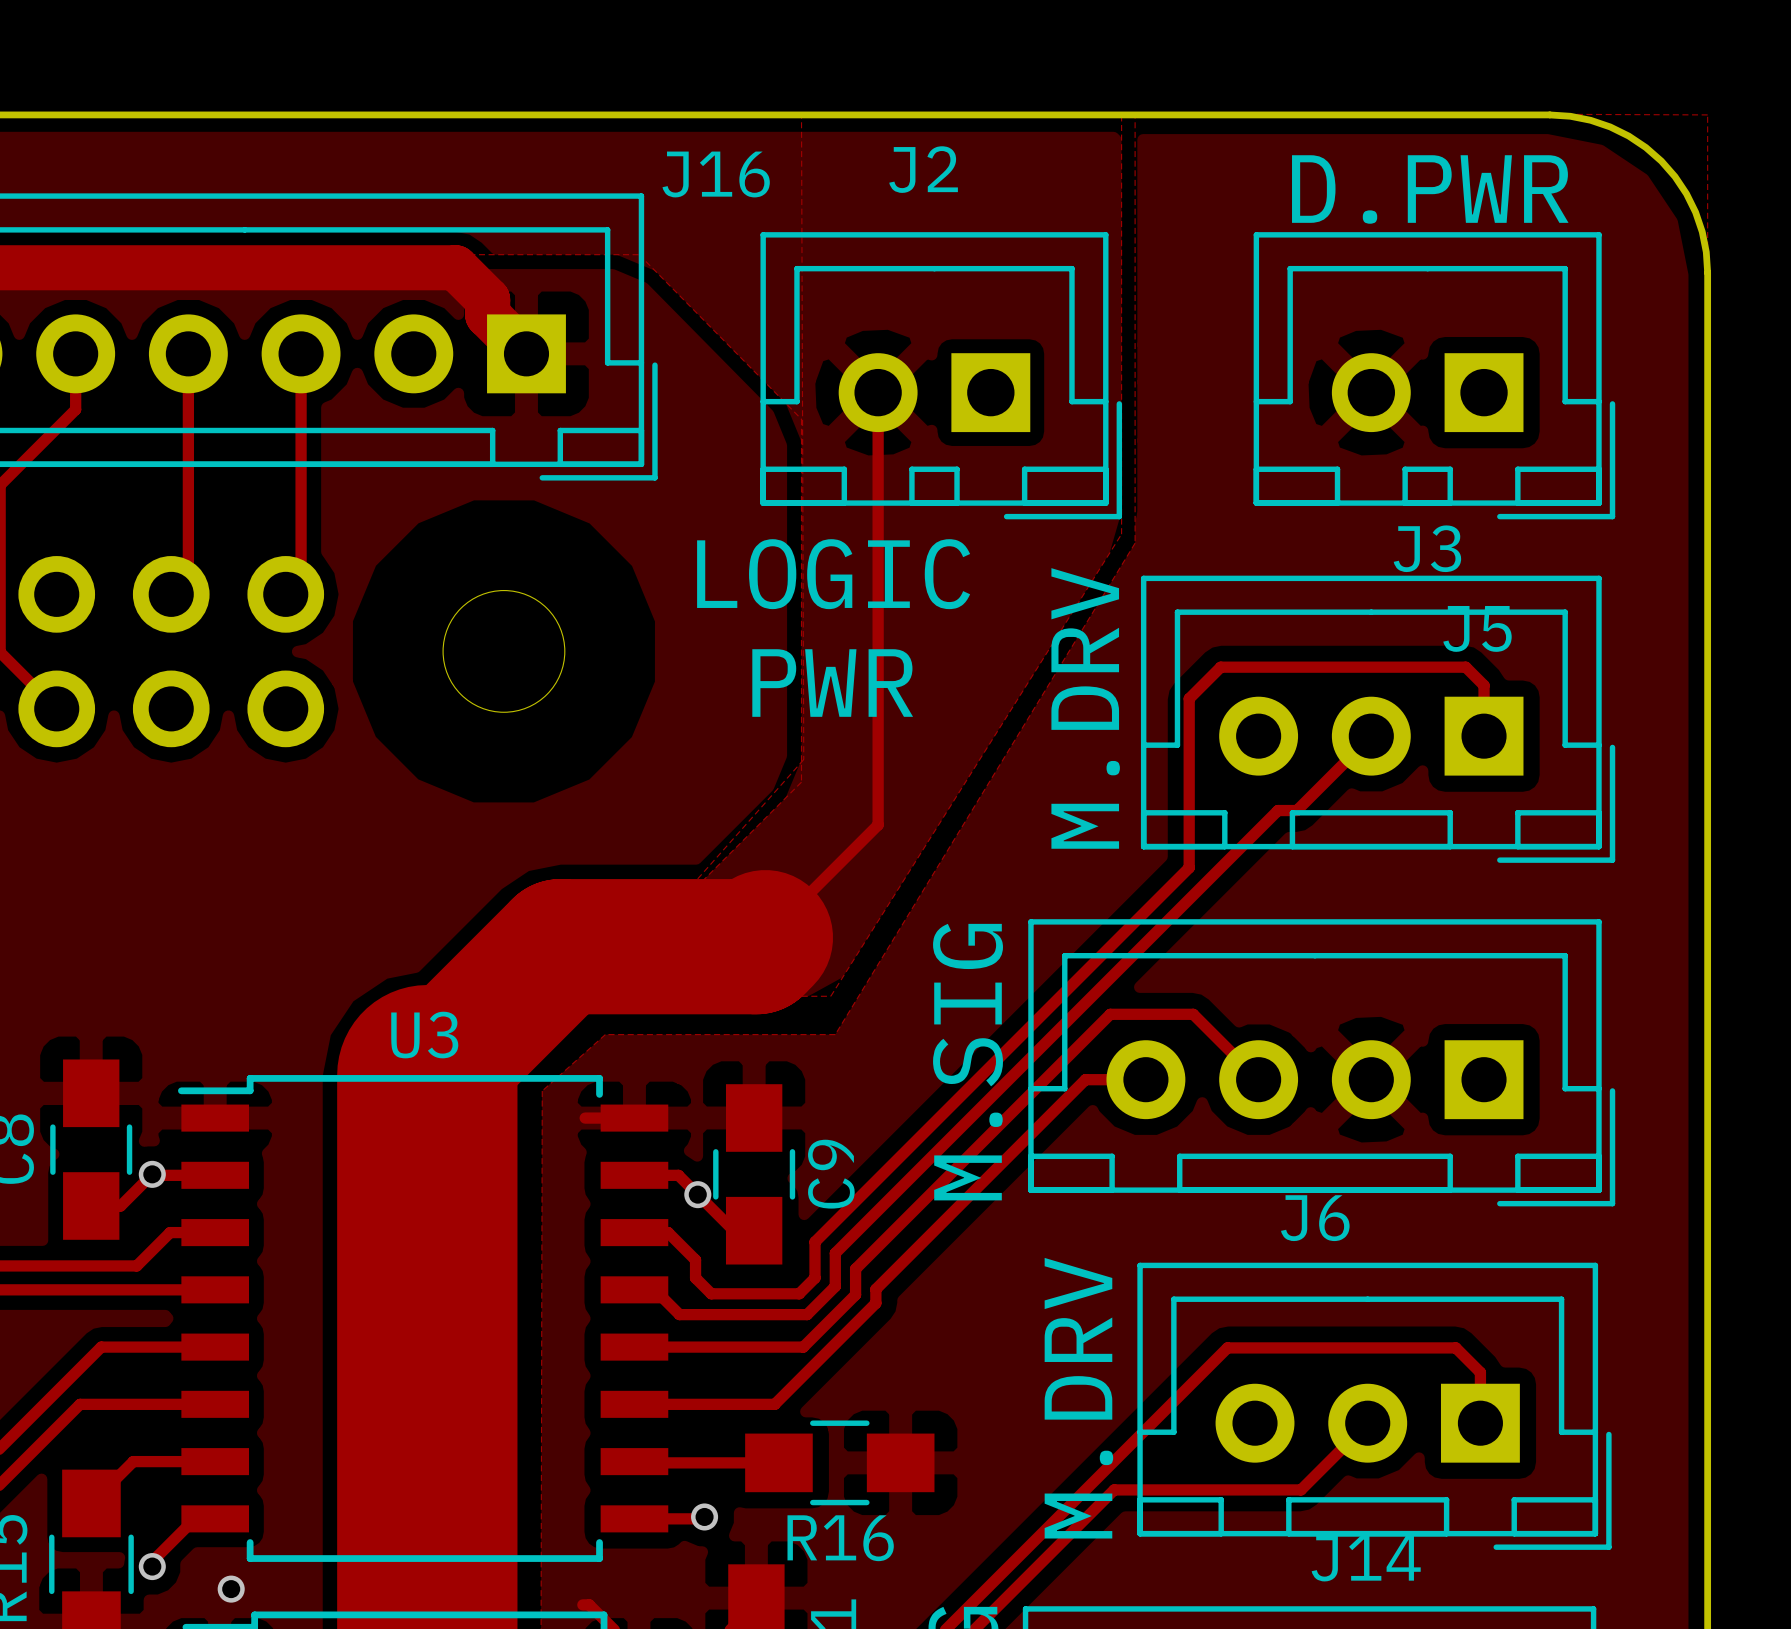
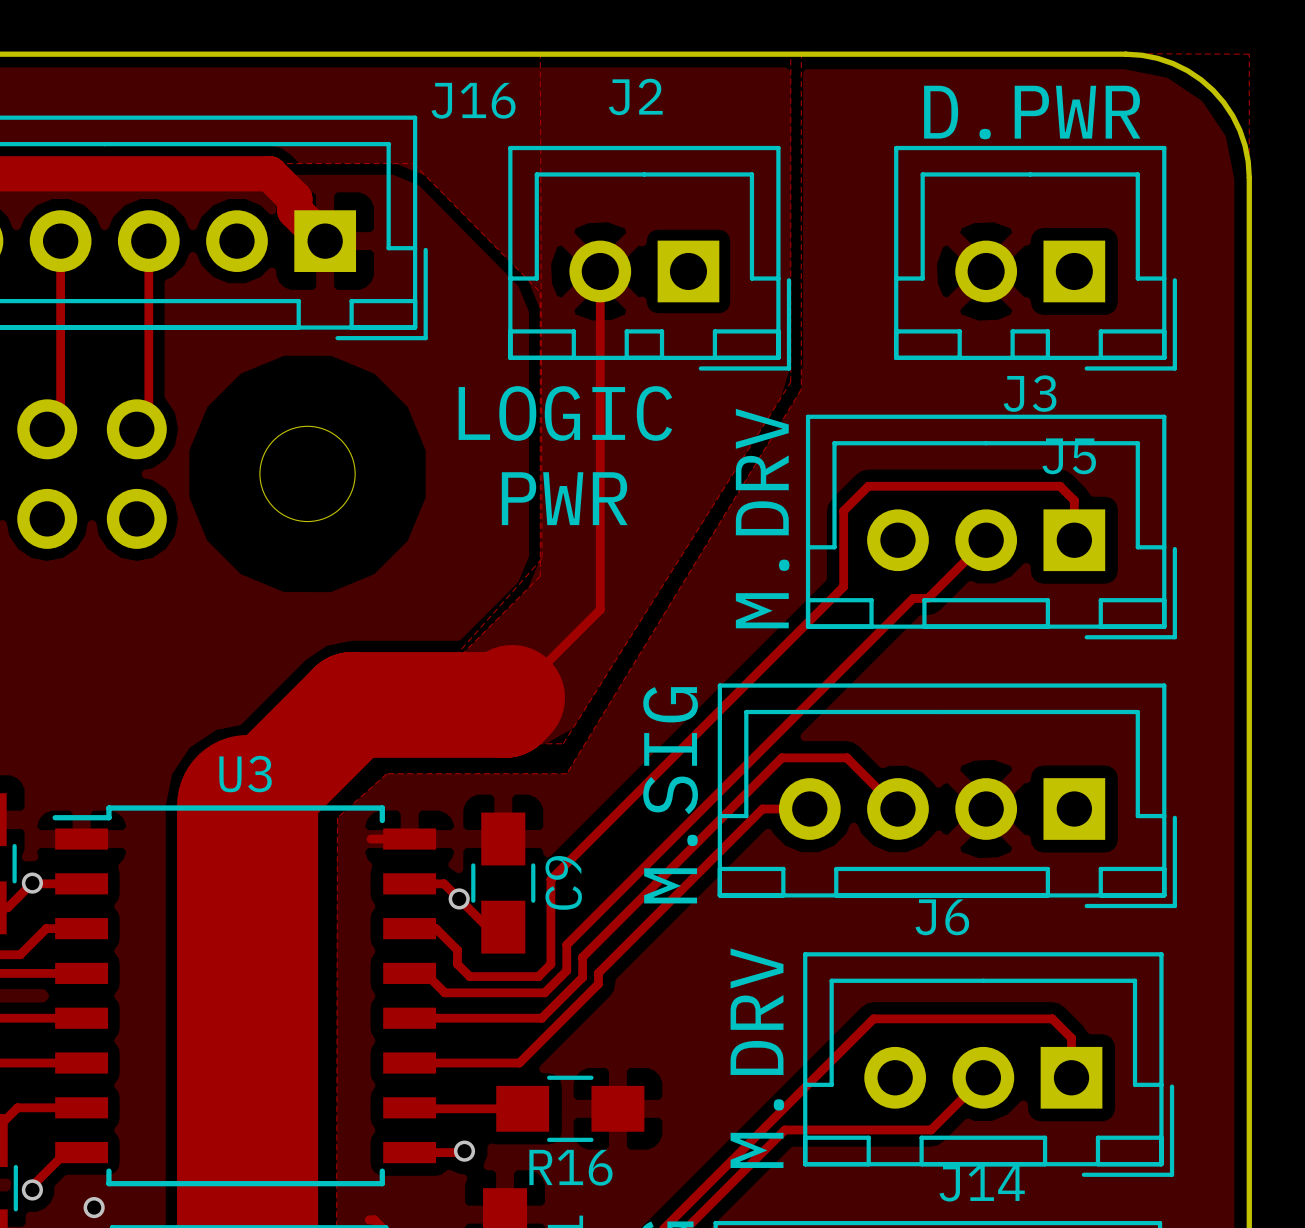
track: (1189, 795) (1189, 867) (815, 1241) -> (843, 586) (550, 879) (550, 935)

